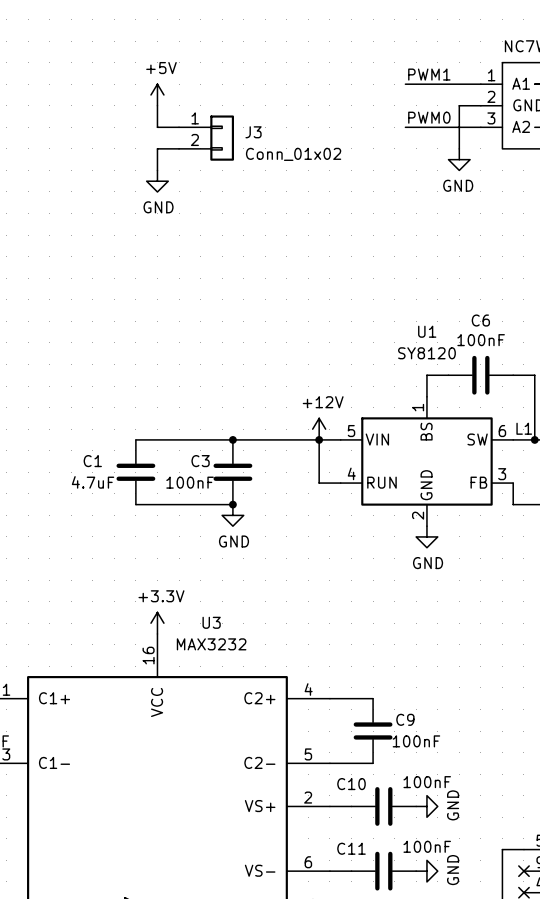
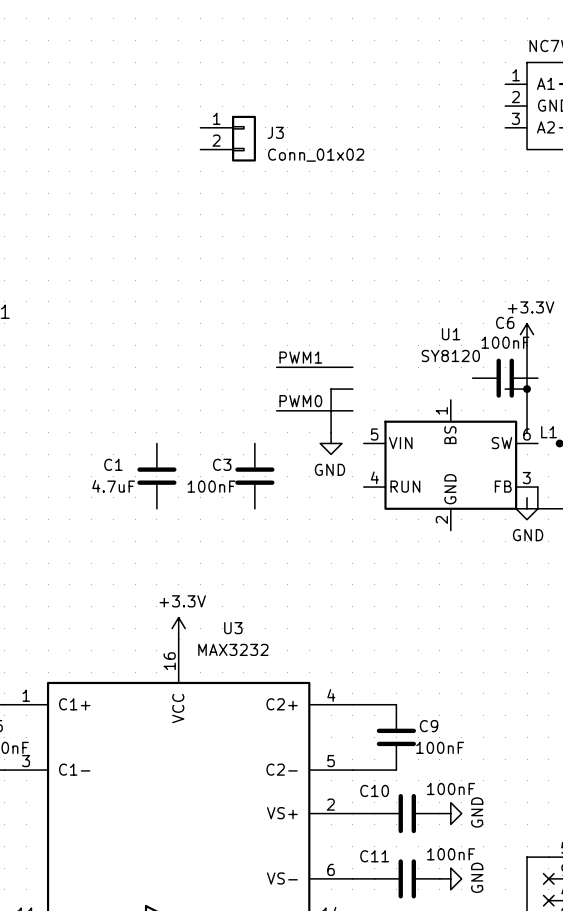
label: PWM1 (429, 74) -> none
wire: (405, 84) (480, 84) -> none
power symbol: +5V (157, 94) -> none
wire: (157, 105) (157, 127) (179, 127) -> none
wire: (480, 105) (459, 105) (459, 148) -> none
label: PWM0 (429, 117) -> none
wire: (405, 127) (480, 127) -> none
wire: (179, 148) (157, 148) (157, 170) -> none
power symbol: GND (459, 159) -> none
power symbol: GND (157, 181) -> none
power symbol: none -> +3.3V (527, 334)
wire: none -> (527, 345) (527, 432)
label: none -> PWM1 (300, 357)
wire: none -> (276, 367) (352, 367)
wire: (448, 375) (426, 375) (426, 396) -> none
wire: (513, 375) (534, 375) (534, 439) (513, 439) -> none
wire: none -> (352, 389) (331, 389) (331, 432)
wire: none -> (505, 389) (527, 389)
junction: none -> (527, 389)
label: none -> PWM0 (300, 401)
wire: none -> (276, 410) (352, 410)
power symbol: +12V (319, 429) -> none
wire: (135, 439) (340, 439) -> none
junction: (232, 439) -> none
power symbol: none -> GND (331, 443)
wire: (319, 439) (319, 483) (340, 483) -> none
junction: (319, 439) -> none
wire: (135, 504) (232, 504) -> none
junction: (232, 504) -> none
power symbol: none -> GND (527, 508)
power symbol: GND (232, 515) -> none
power symbol: GND (426, 536) -> none

